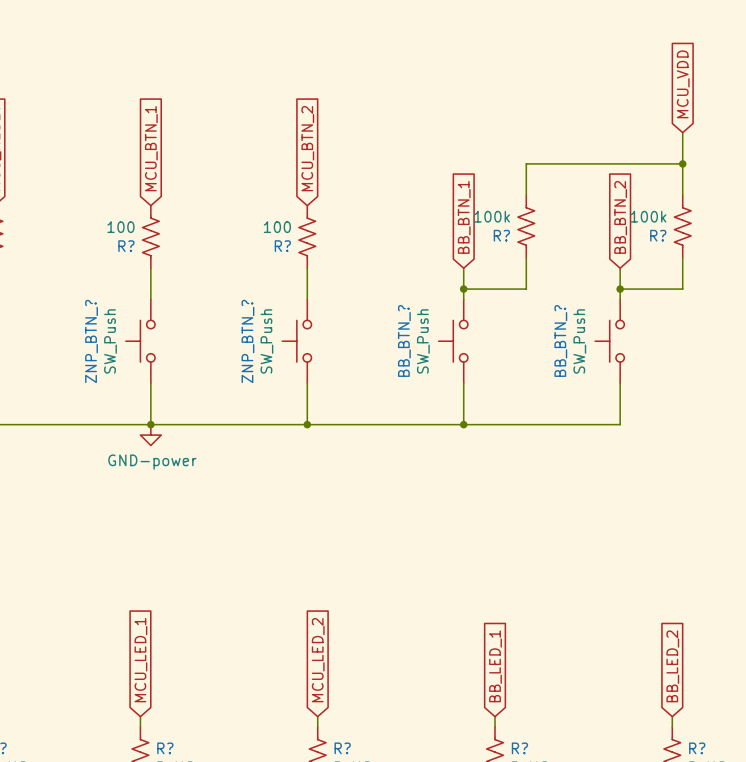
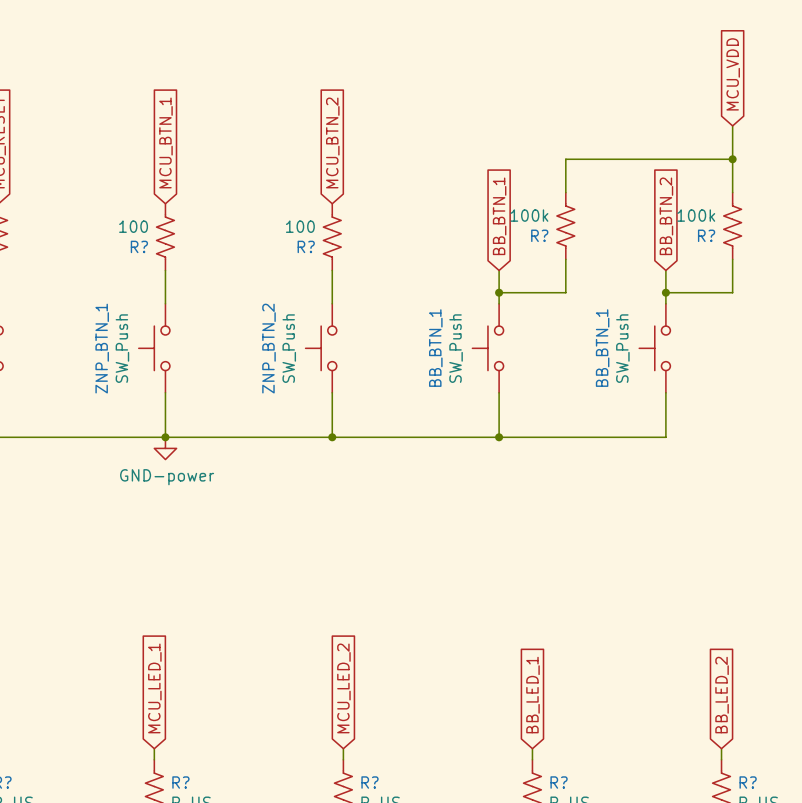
BB_BTN_? name: BB_BTN_? (404, 340) -> BB_BTN_1 (435, 348)
BB_BTN_? name: BB_BTN_? (560, 340) -> BB_BTN_1 (602, 348)
ZNP_BTN_? name: ZNP_BTN_? (91, 341) -> ZNP_BTN_1 (102, 348)
ZNP_BTN_? name: ZNP_BTN_? (247, 341) -> ZNP_BTN_2 (268, 348)

